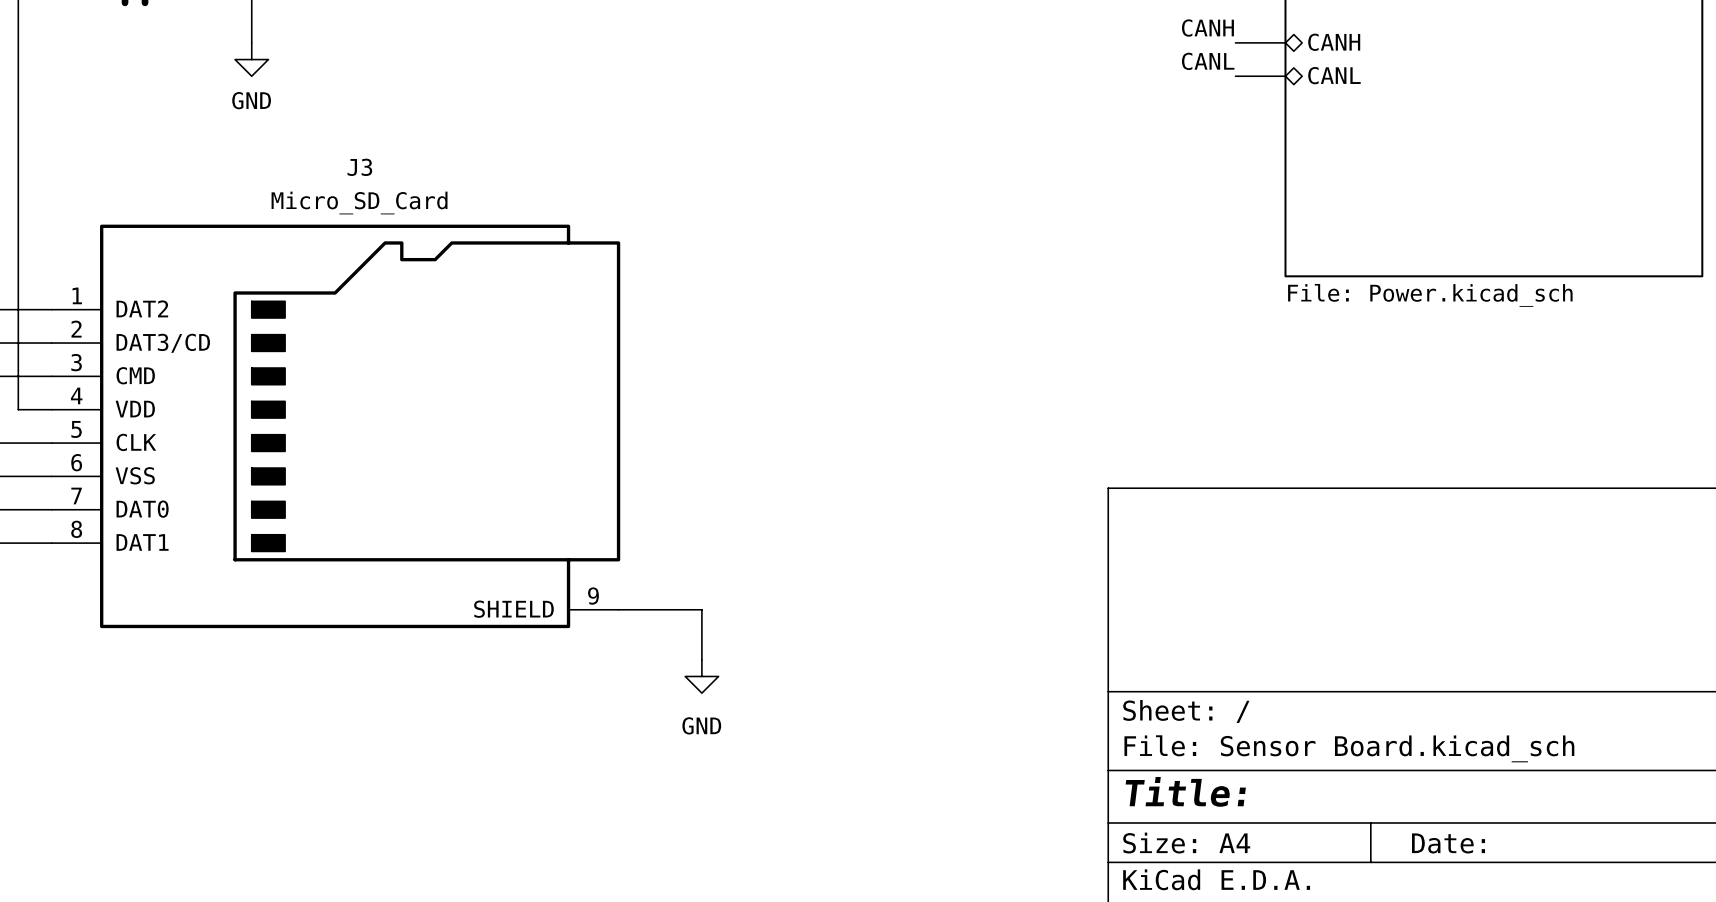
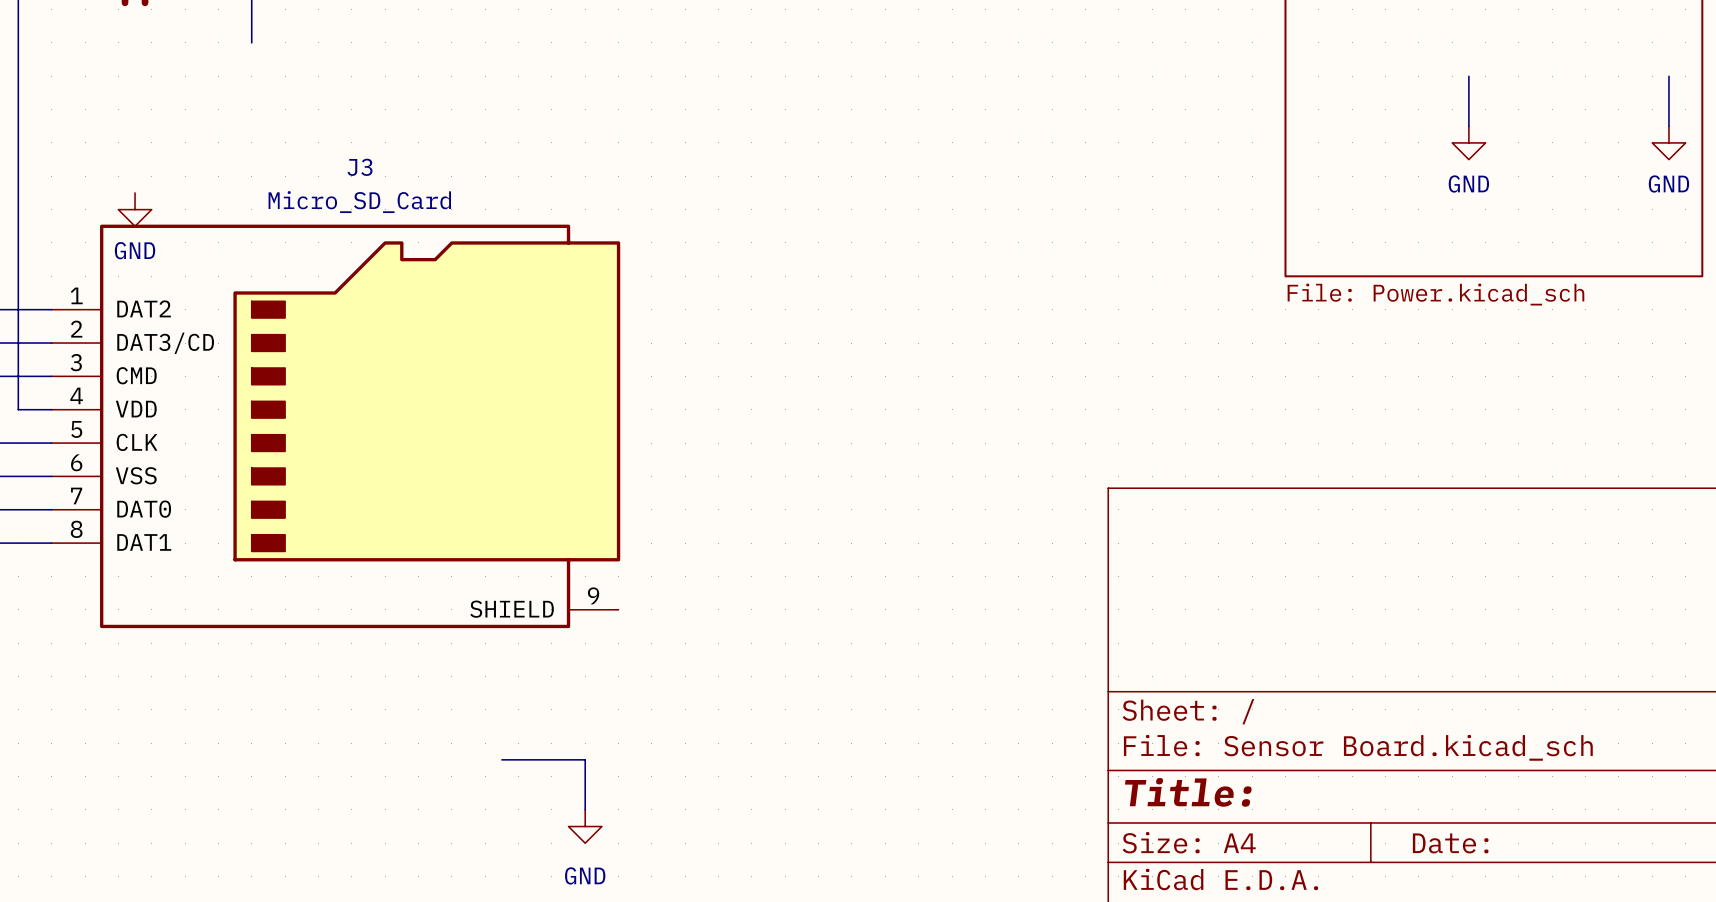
label: CANH (1207, 28) -> none
wire: (1235, 42) (1285, 42) -> none
sheet pin: CANH (1334, 42) -> none
power symbol position: GND (251, 59) -> GND (135, 209)
label: CANL (1208, 61) -> none
sheet pin: CANL (1334, 75) -> none
wire: (1235, 76) (1285, 76) -> none
wire: none -> (1468, 76) (1468, 126)
wire: none -> (1668, 76) (1668, 126)
power symbol: none -> GND (1468, 142)
power symbol: none -> GND (1668, 142)
wire: (618, 609) (701, 609) (701, 659) -> (501, 759) (585, 759) (585, 809)
power symbol position: GND (701, 676) -> GND (585, 826)

